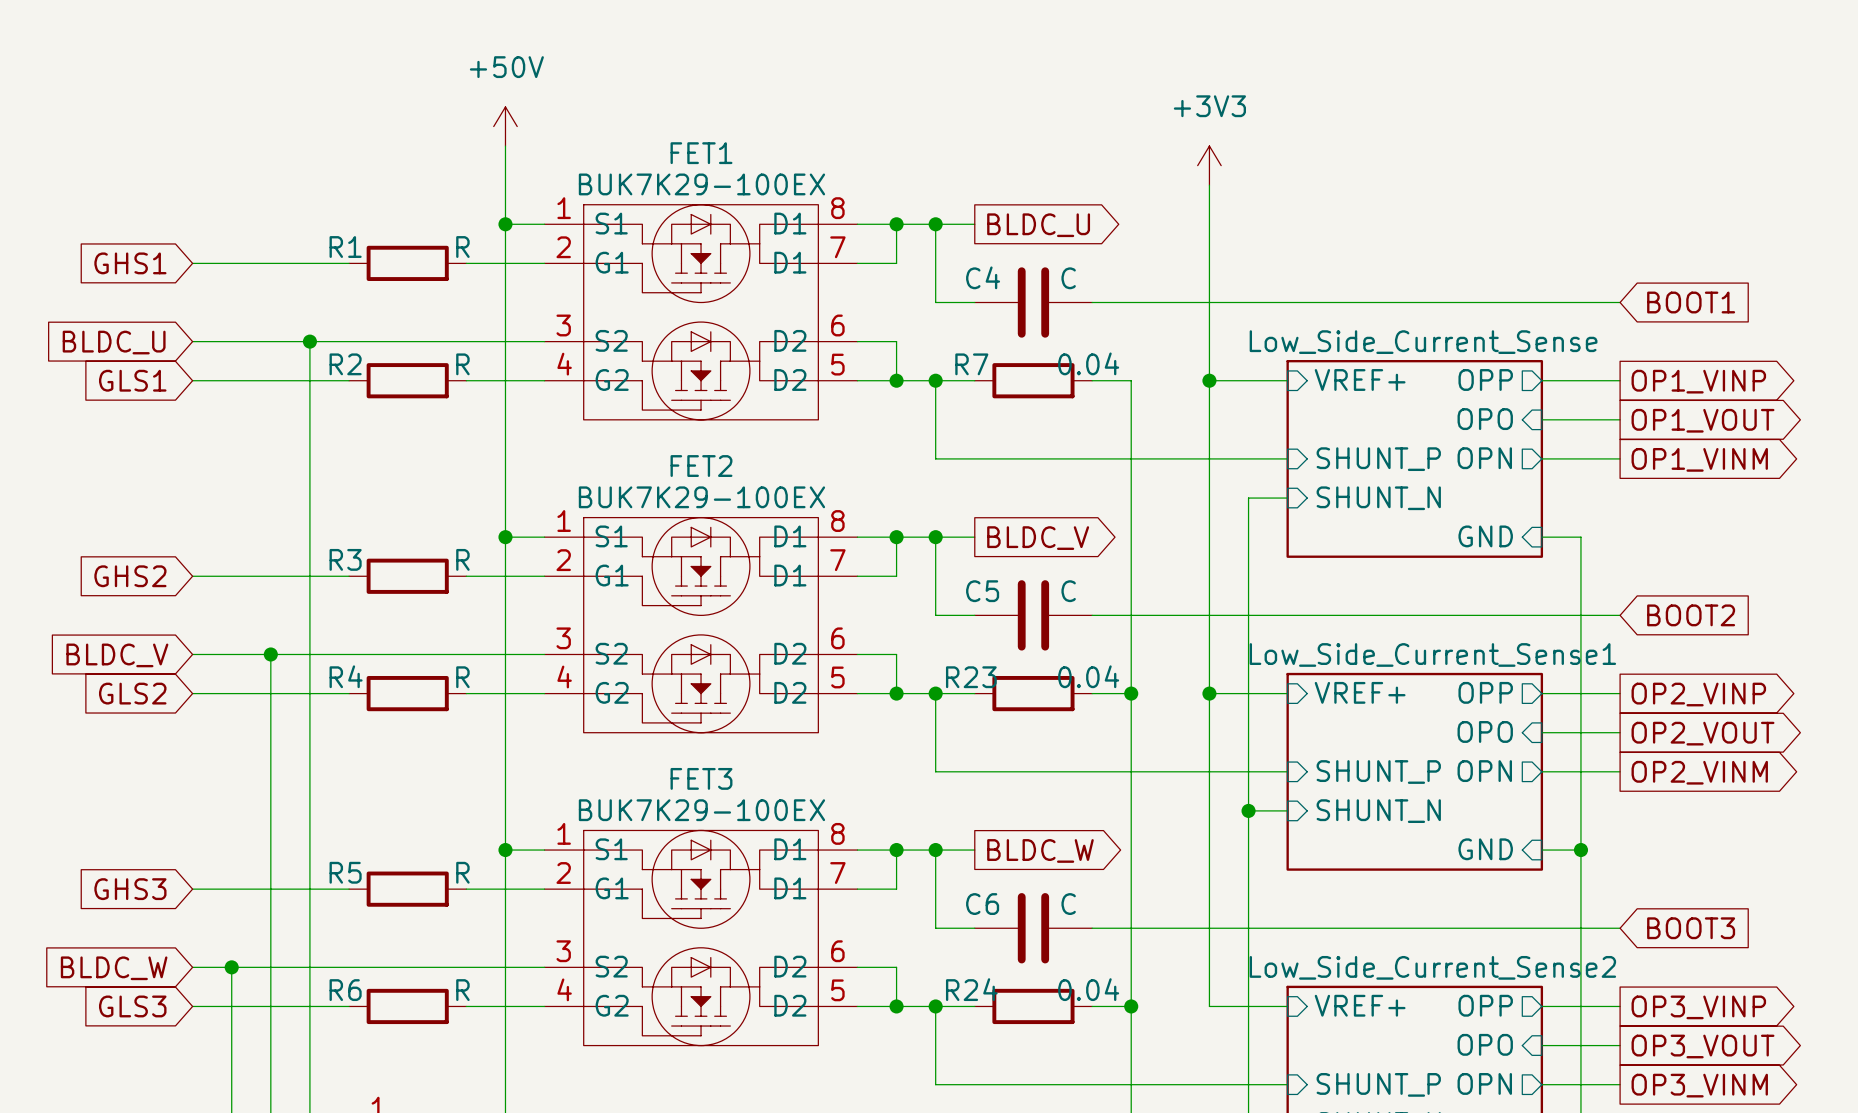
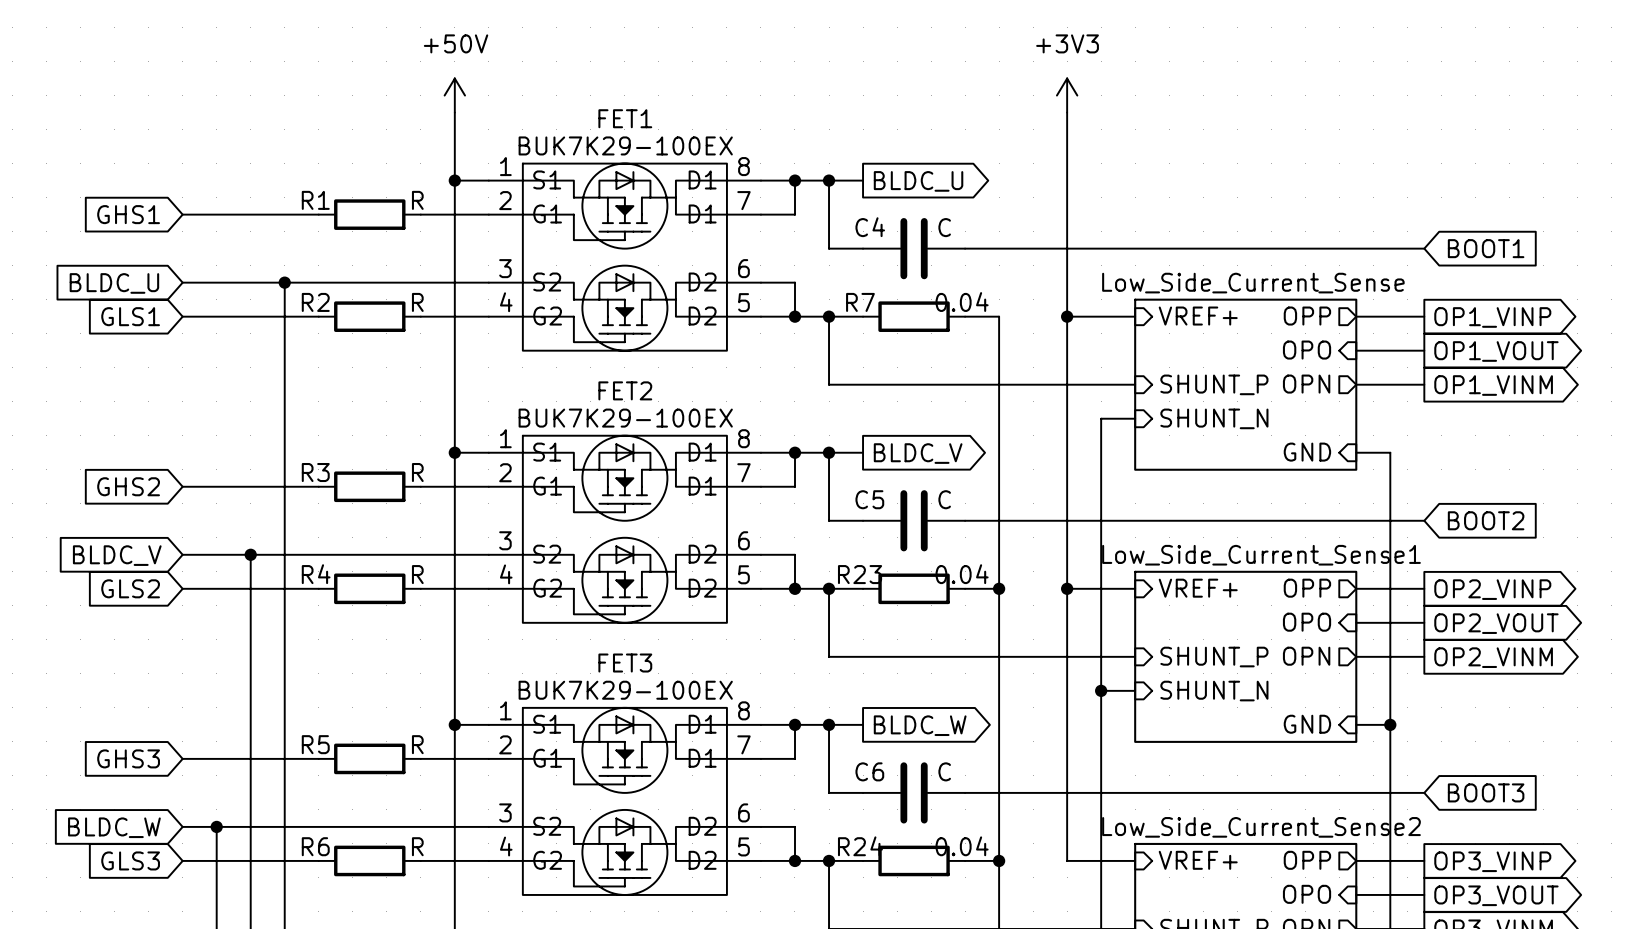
power symbol position: +3V3 (1209, 165) -> +3V3 (1067, 95)

